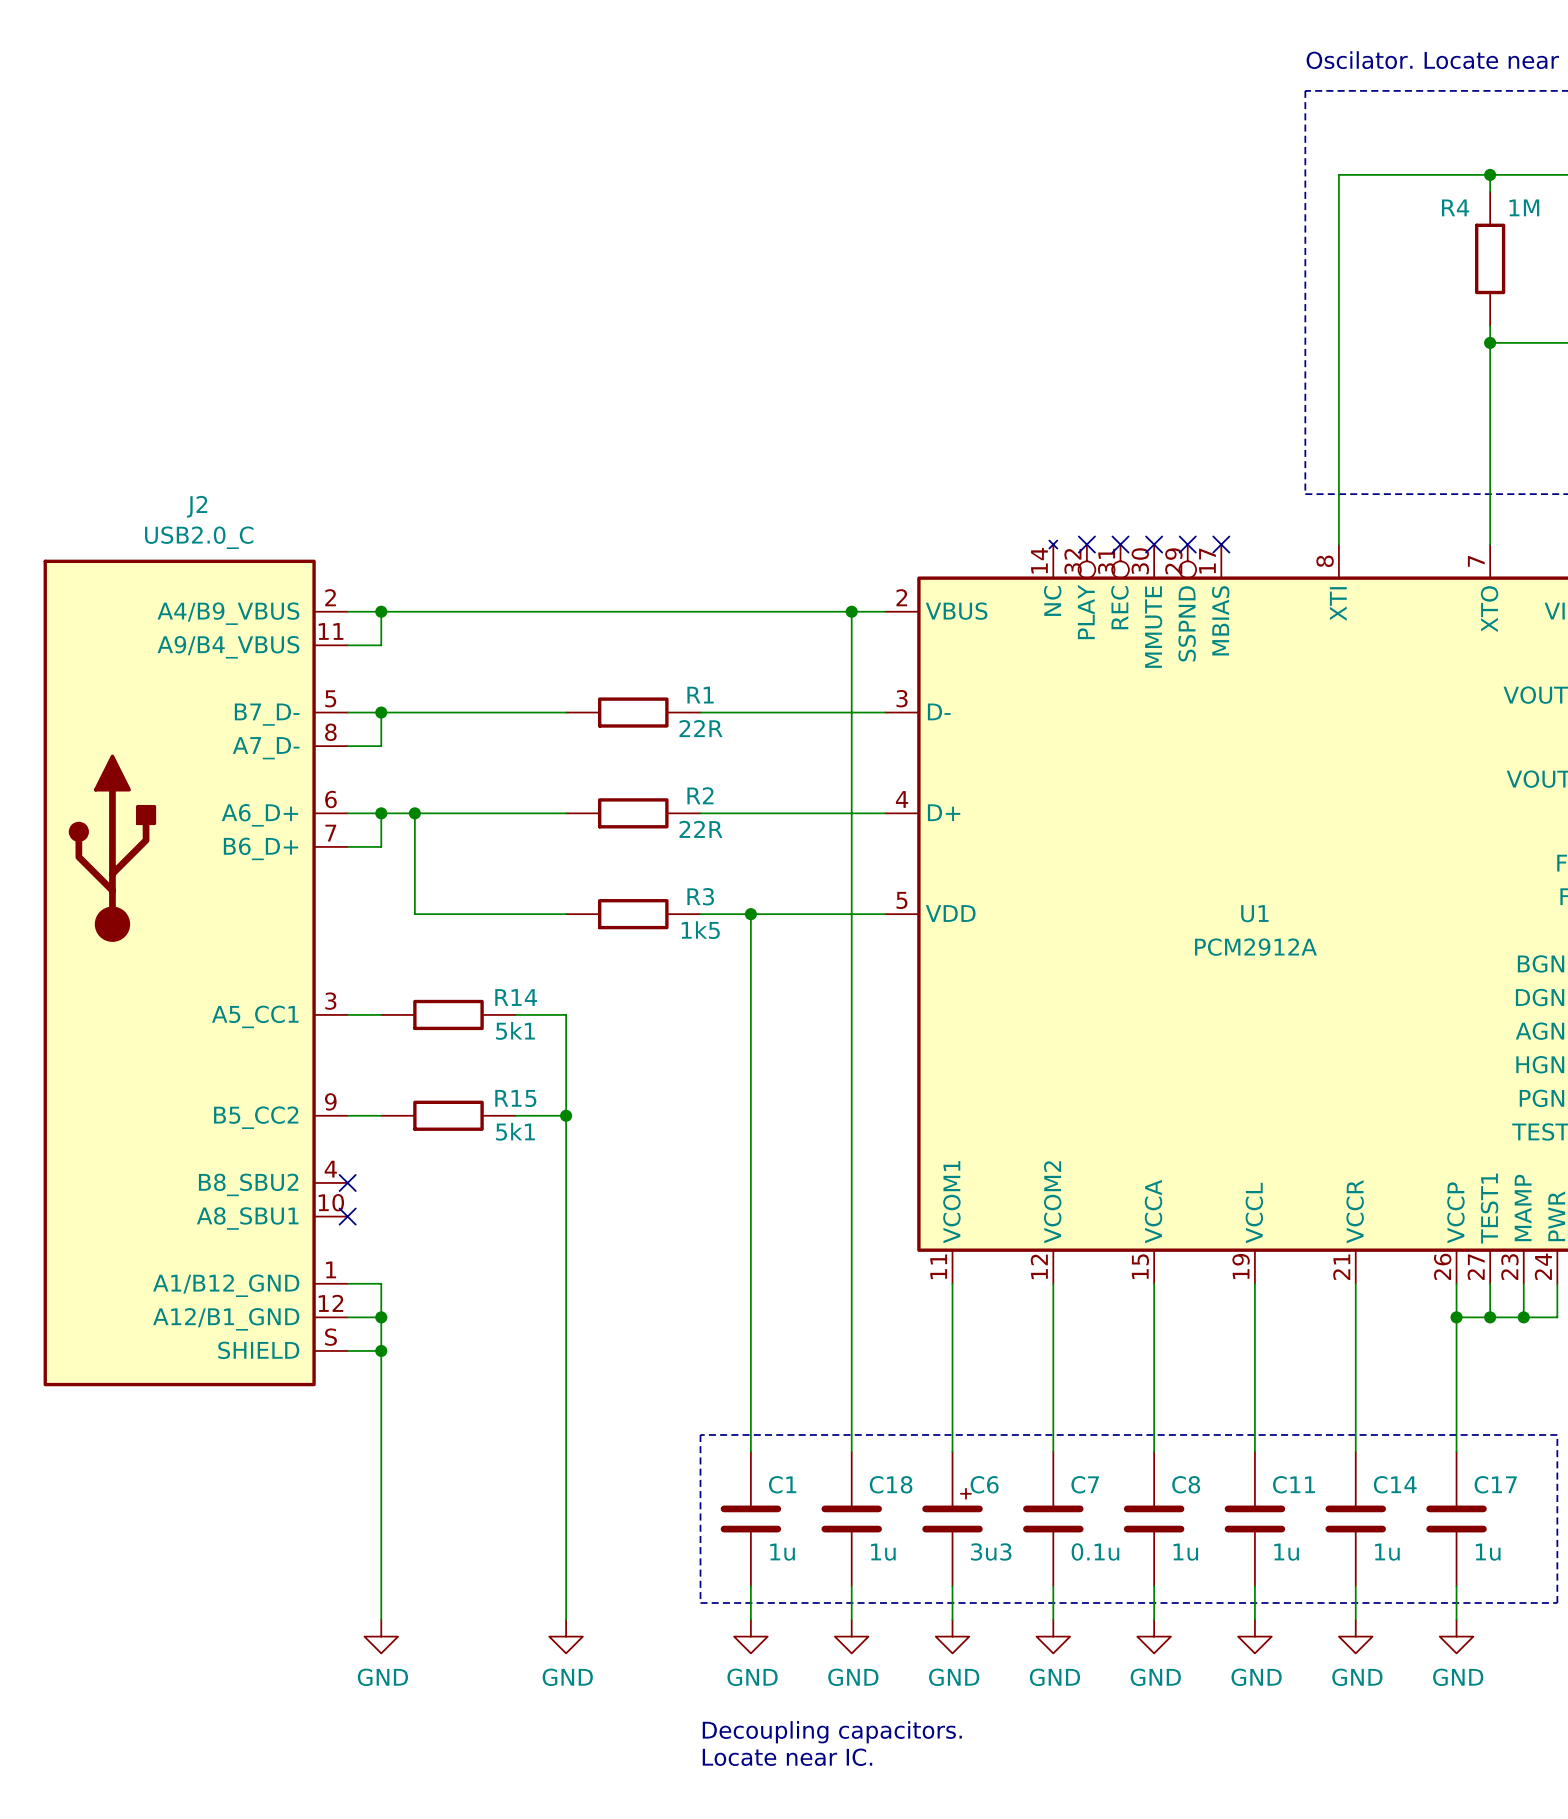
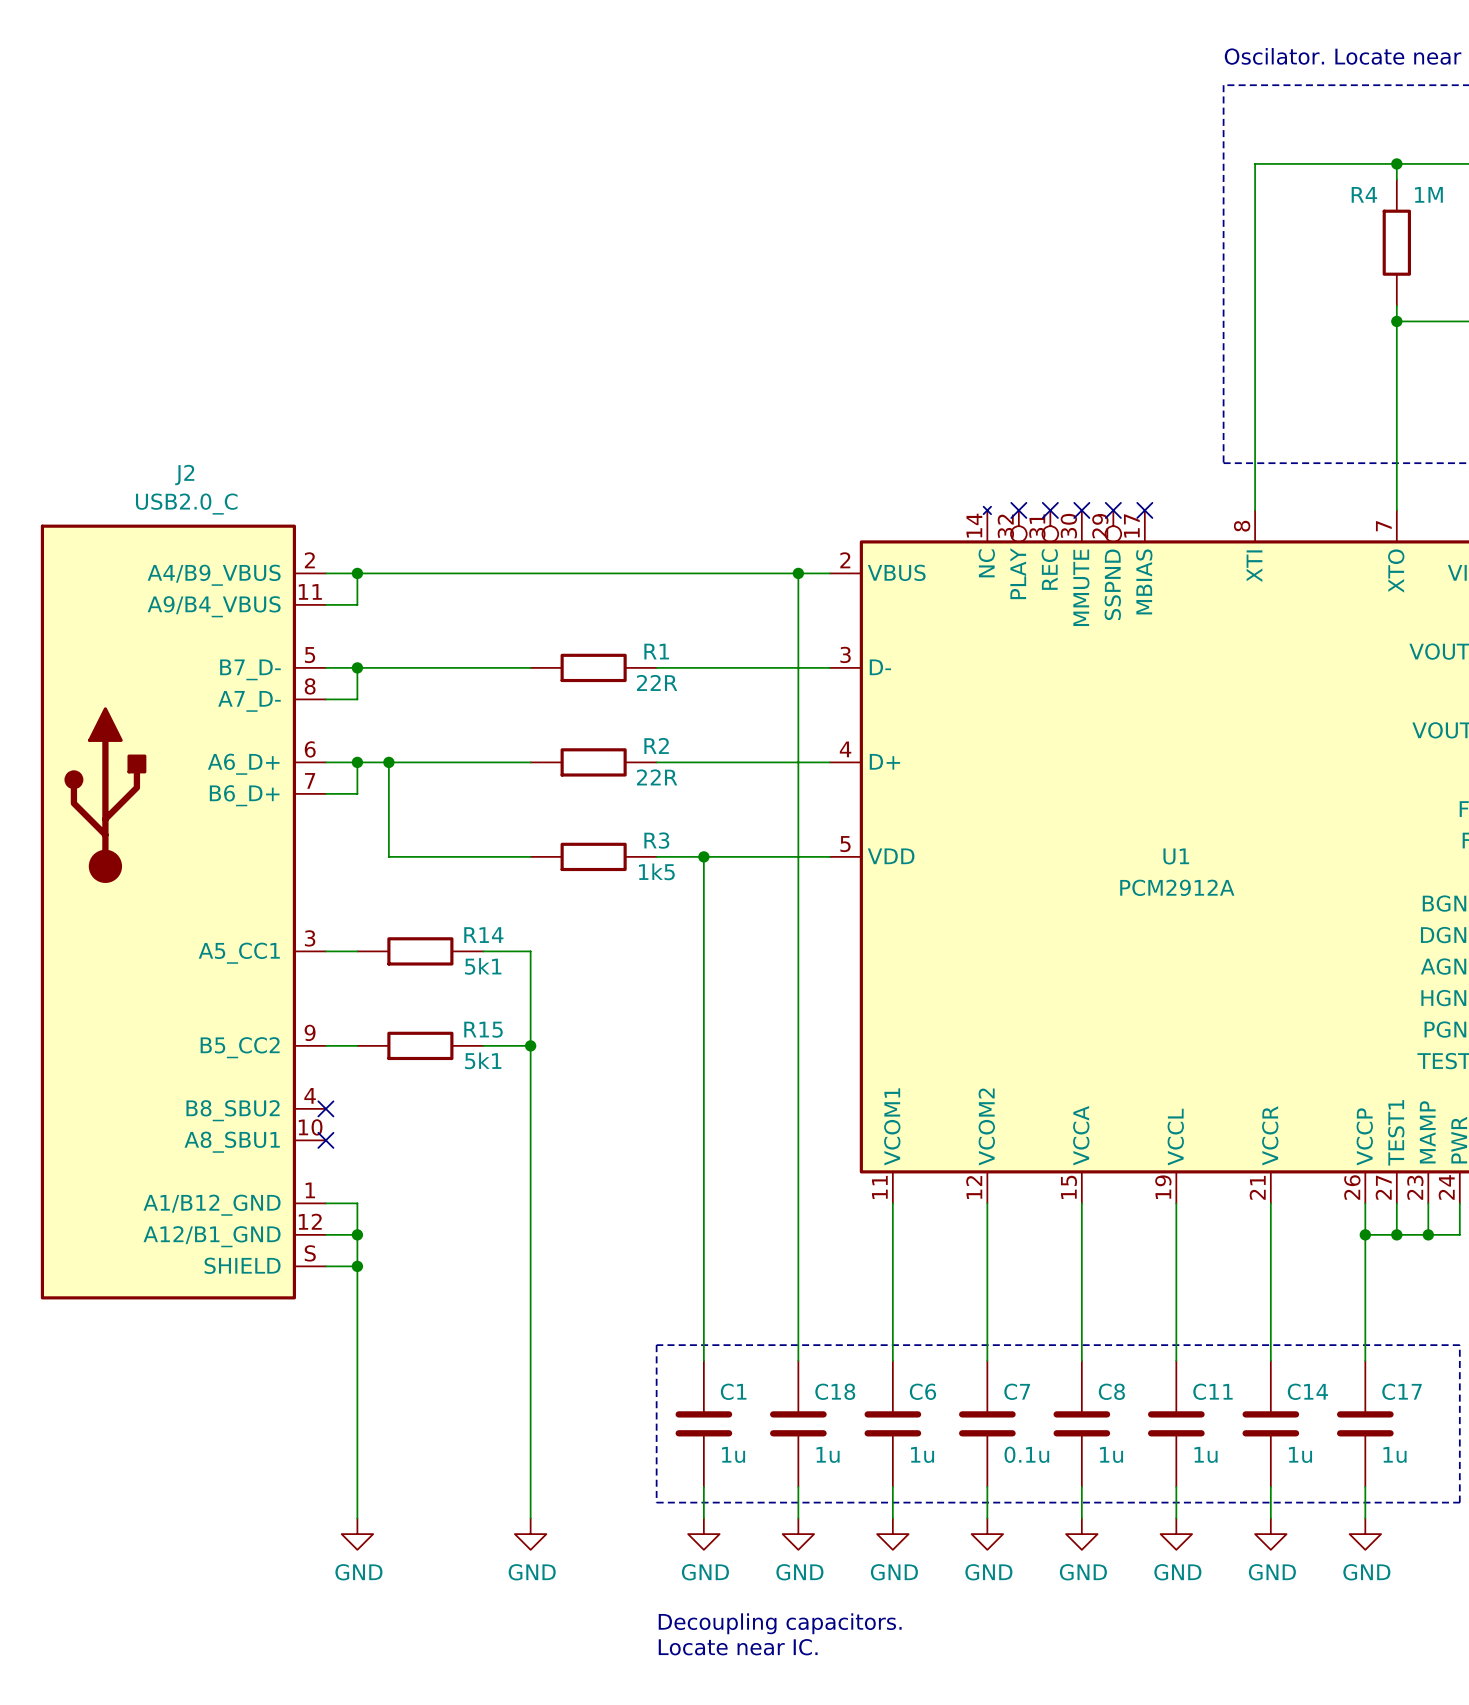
C6 symbol: [922, 1451, 983, 1587] -> [864, 1360, 922, 1487]
C6 value: 3u3 (991, 1551) -> 1u (922, 1454)

